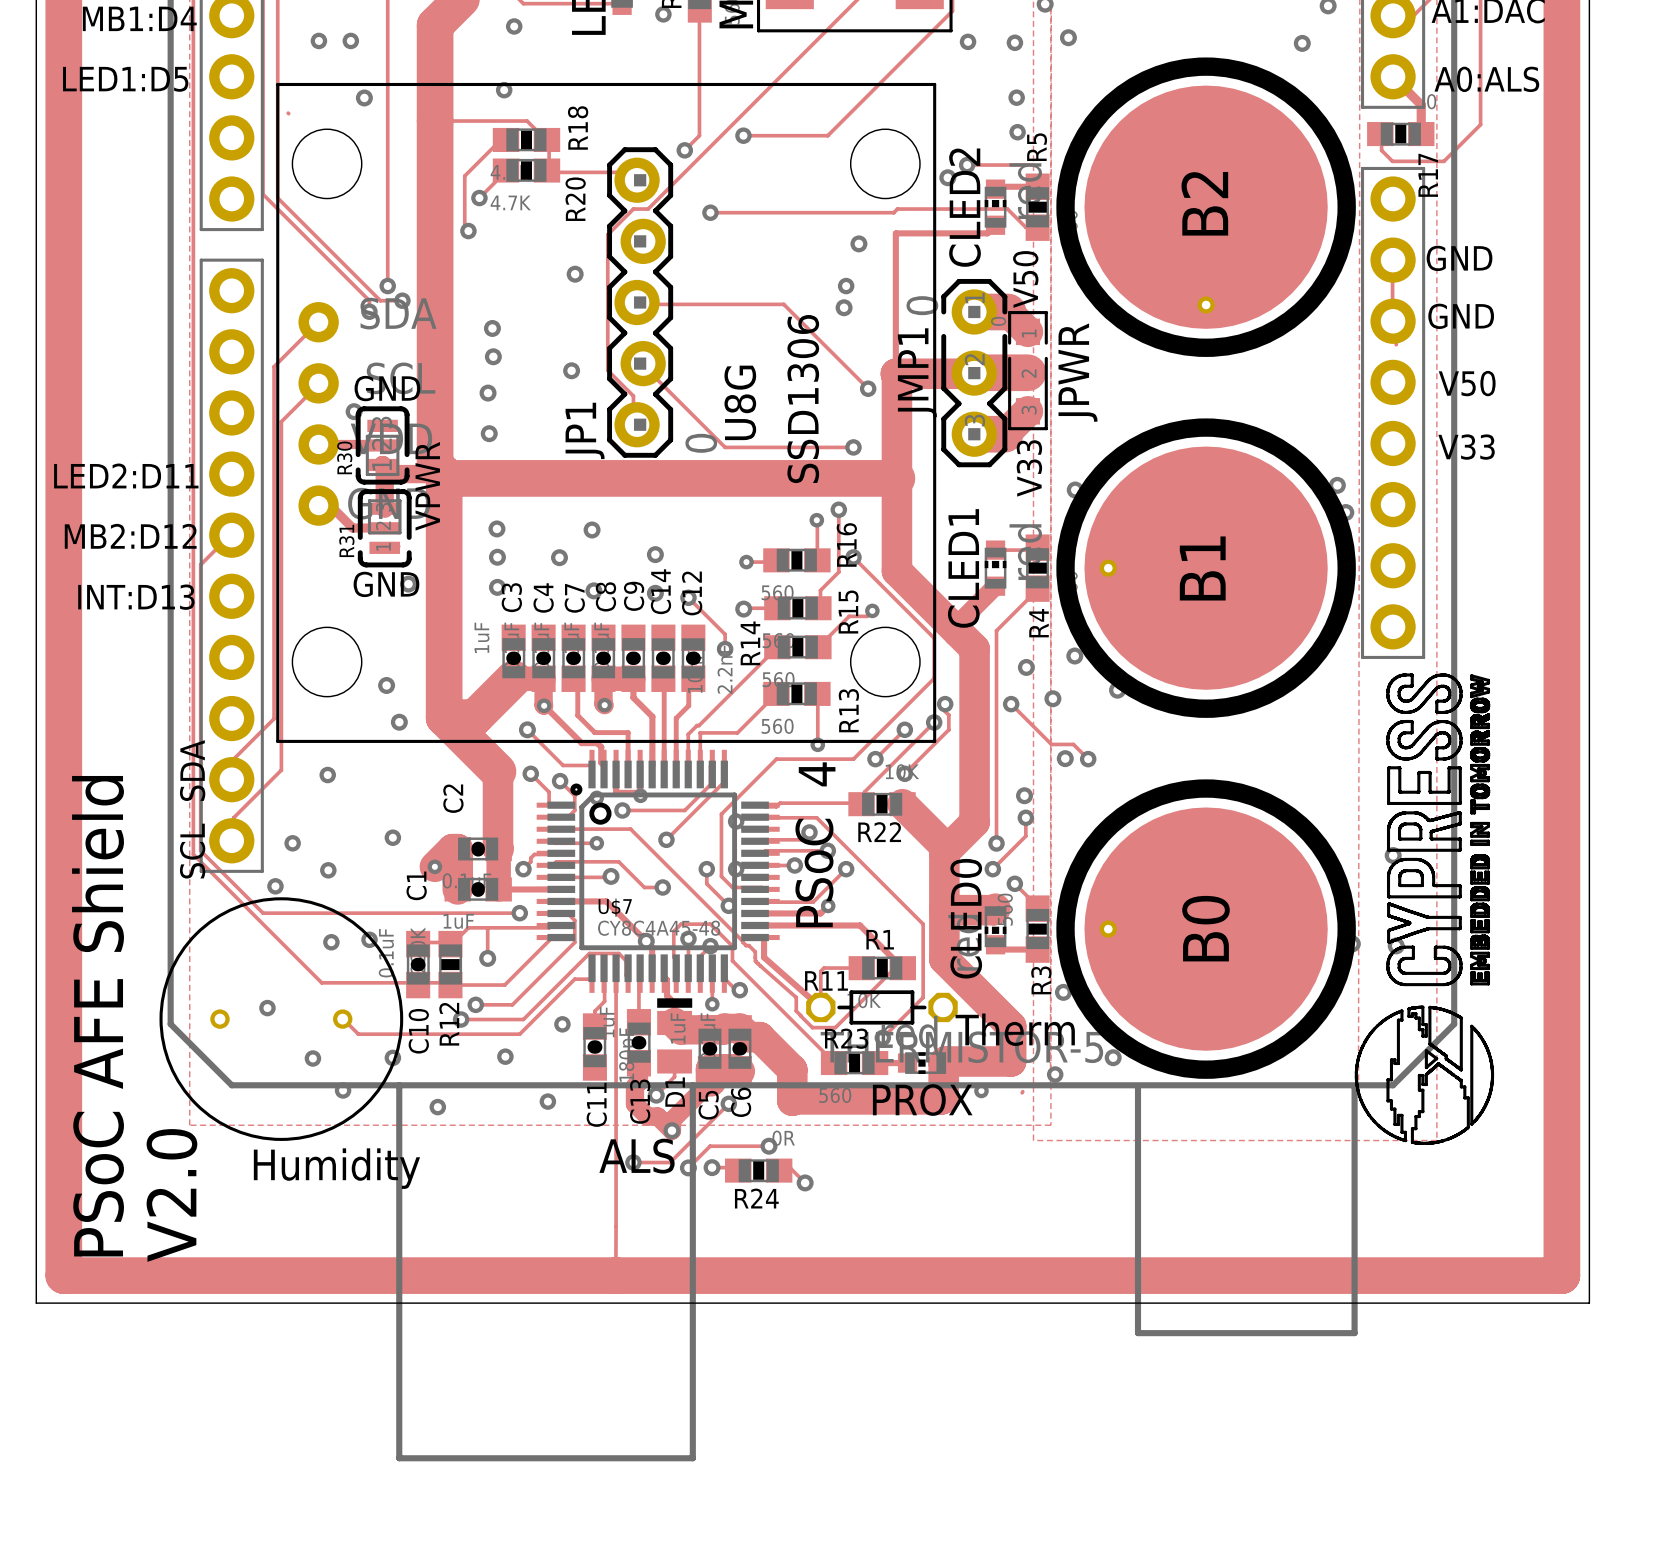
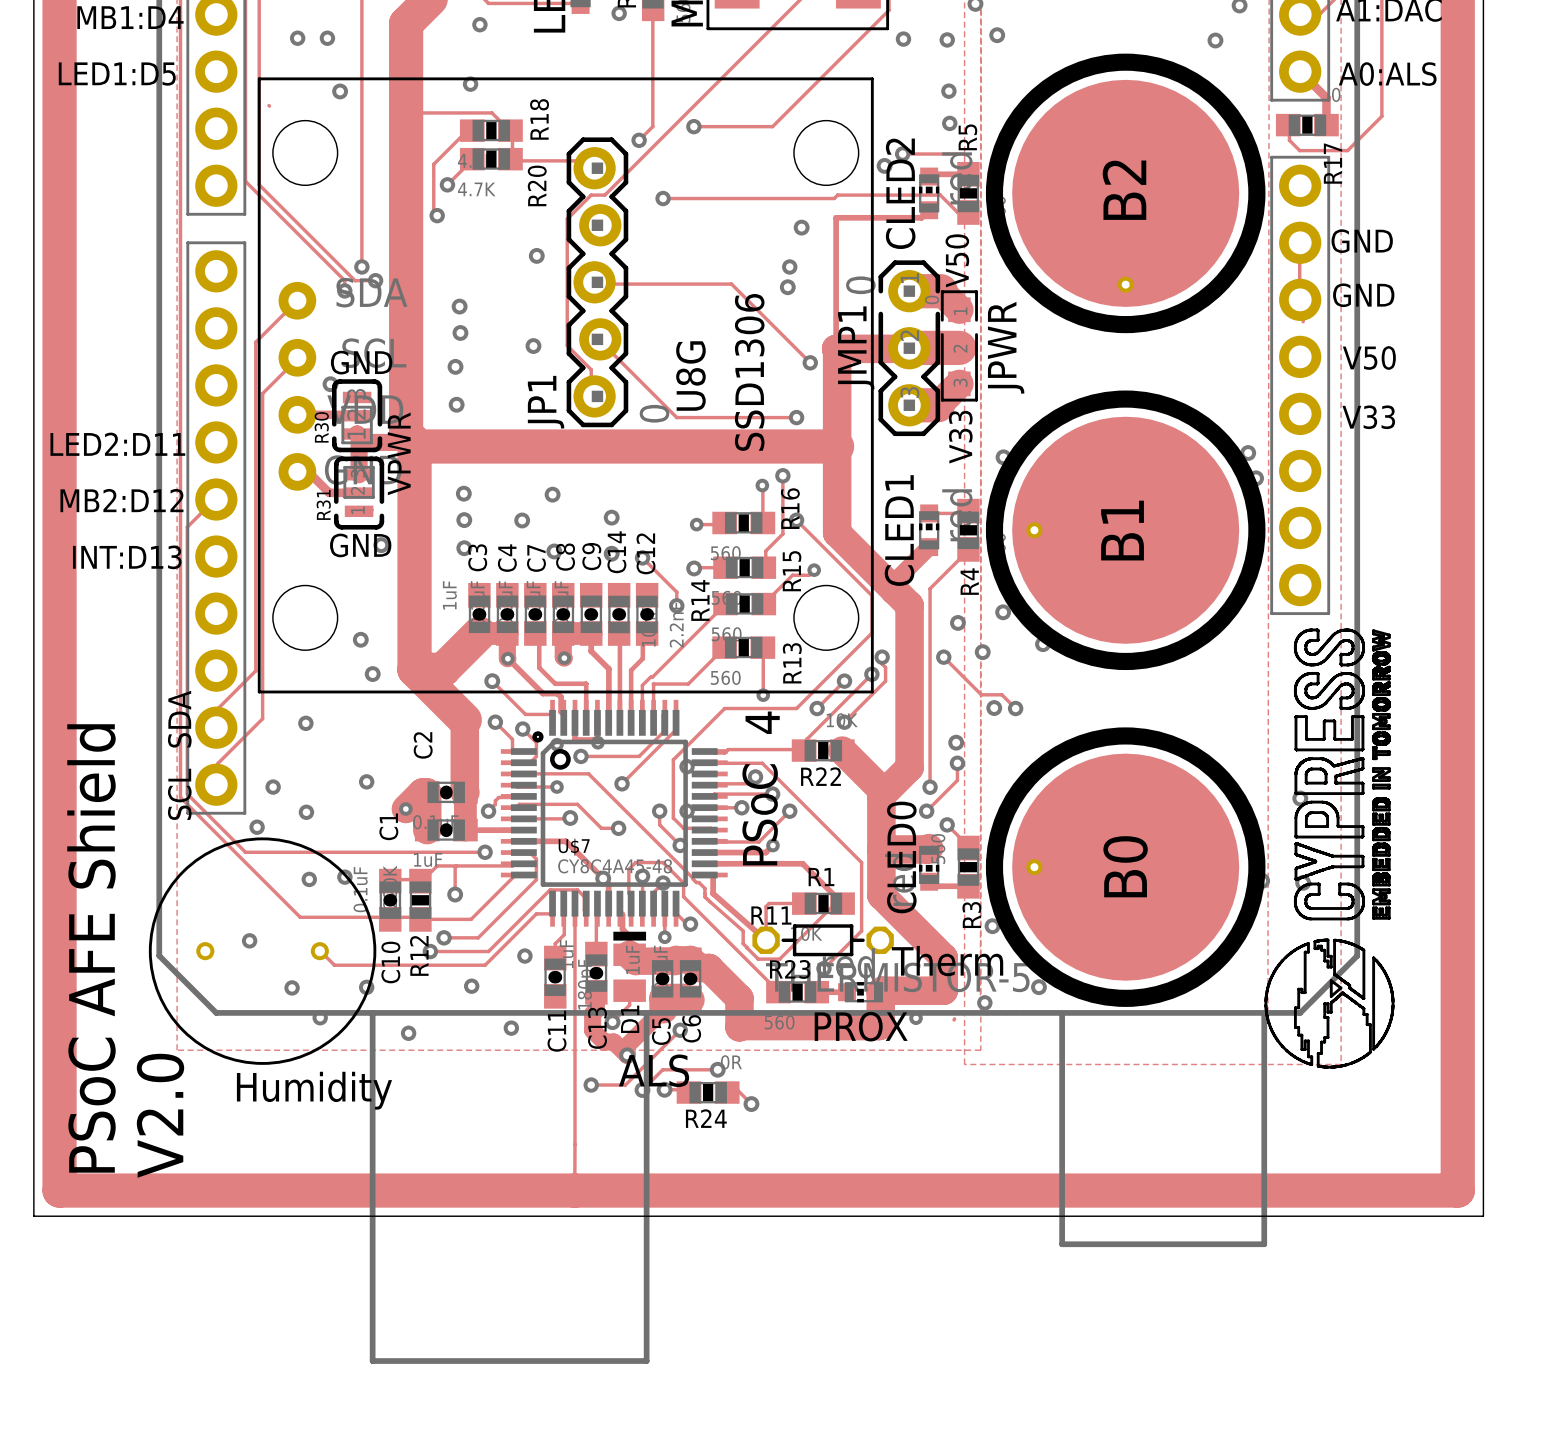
text position: ALS (637, 1156) -> ALS (654, 1070)

